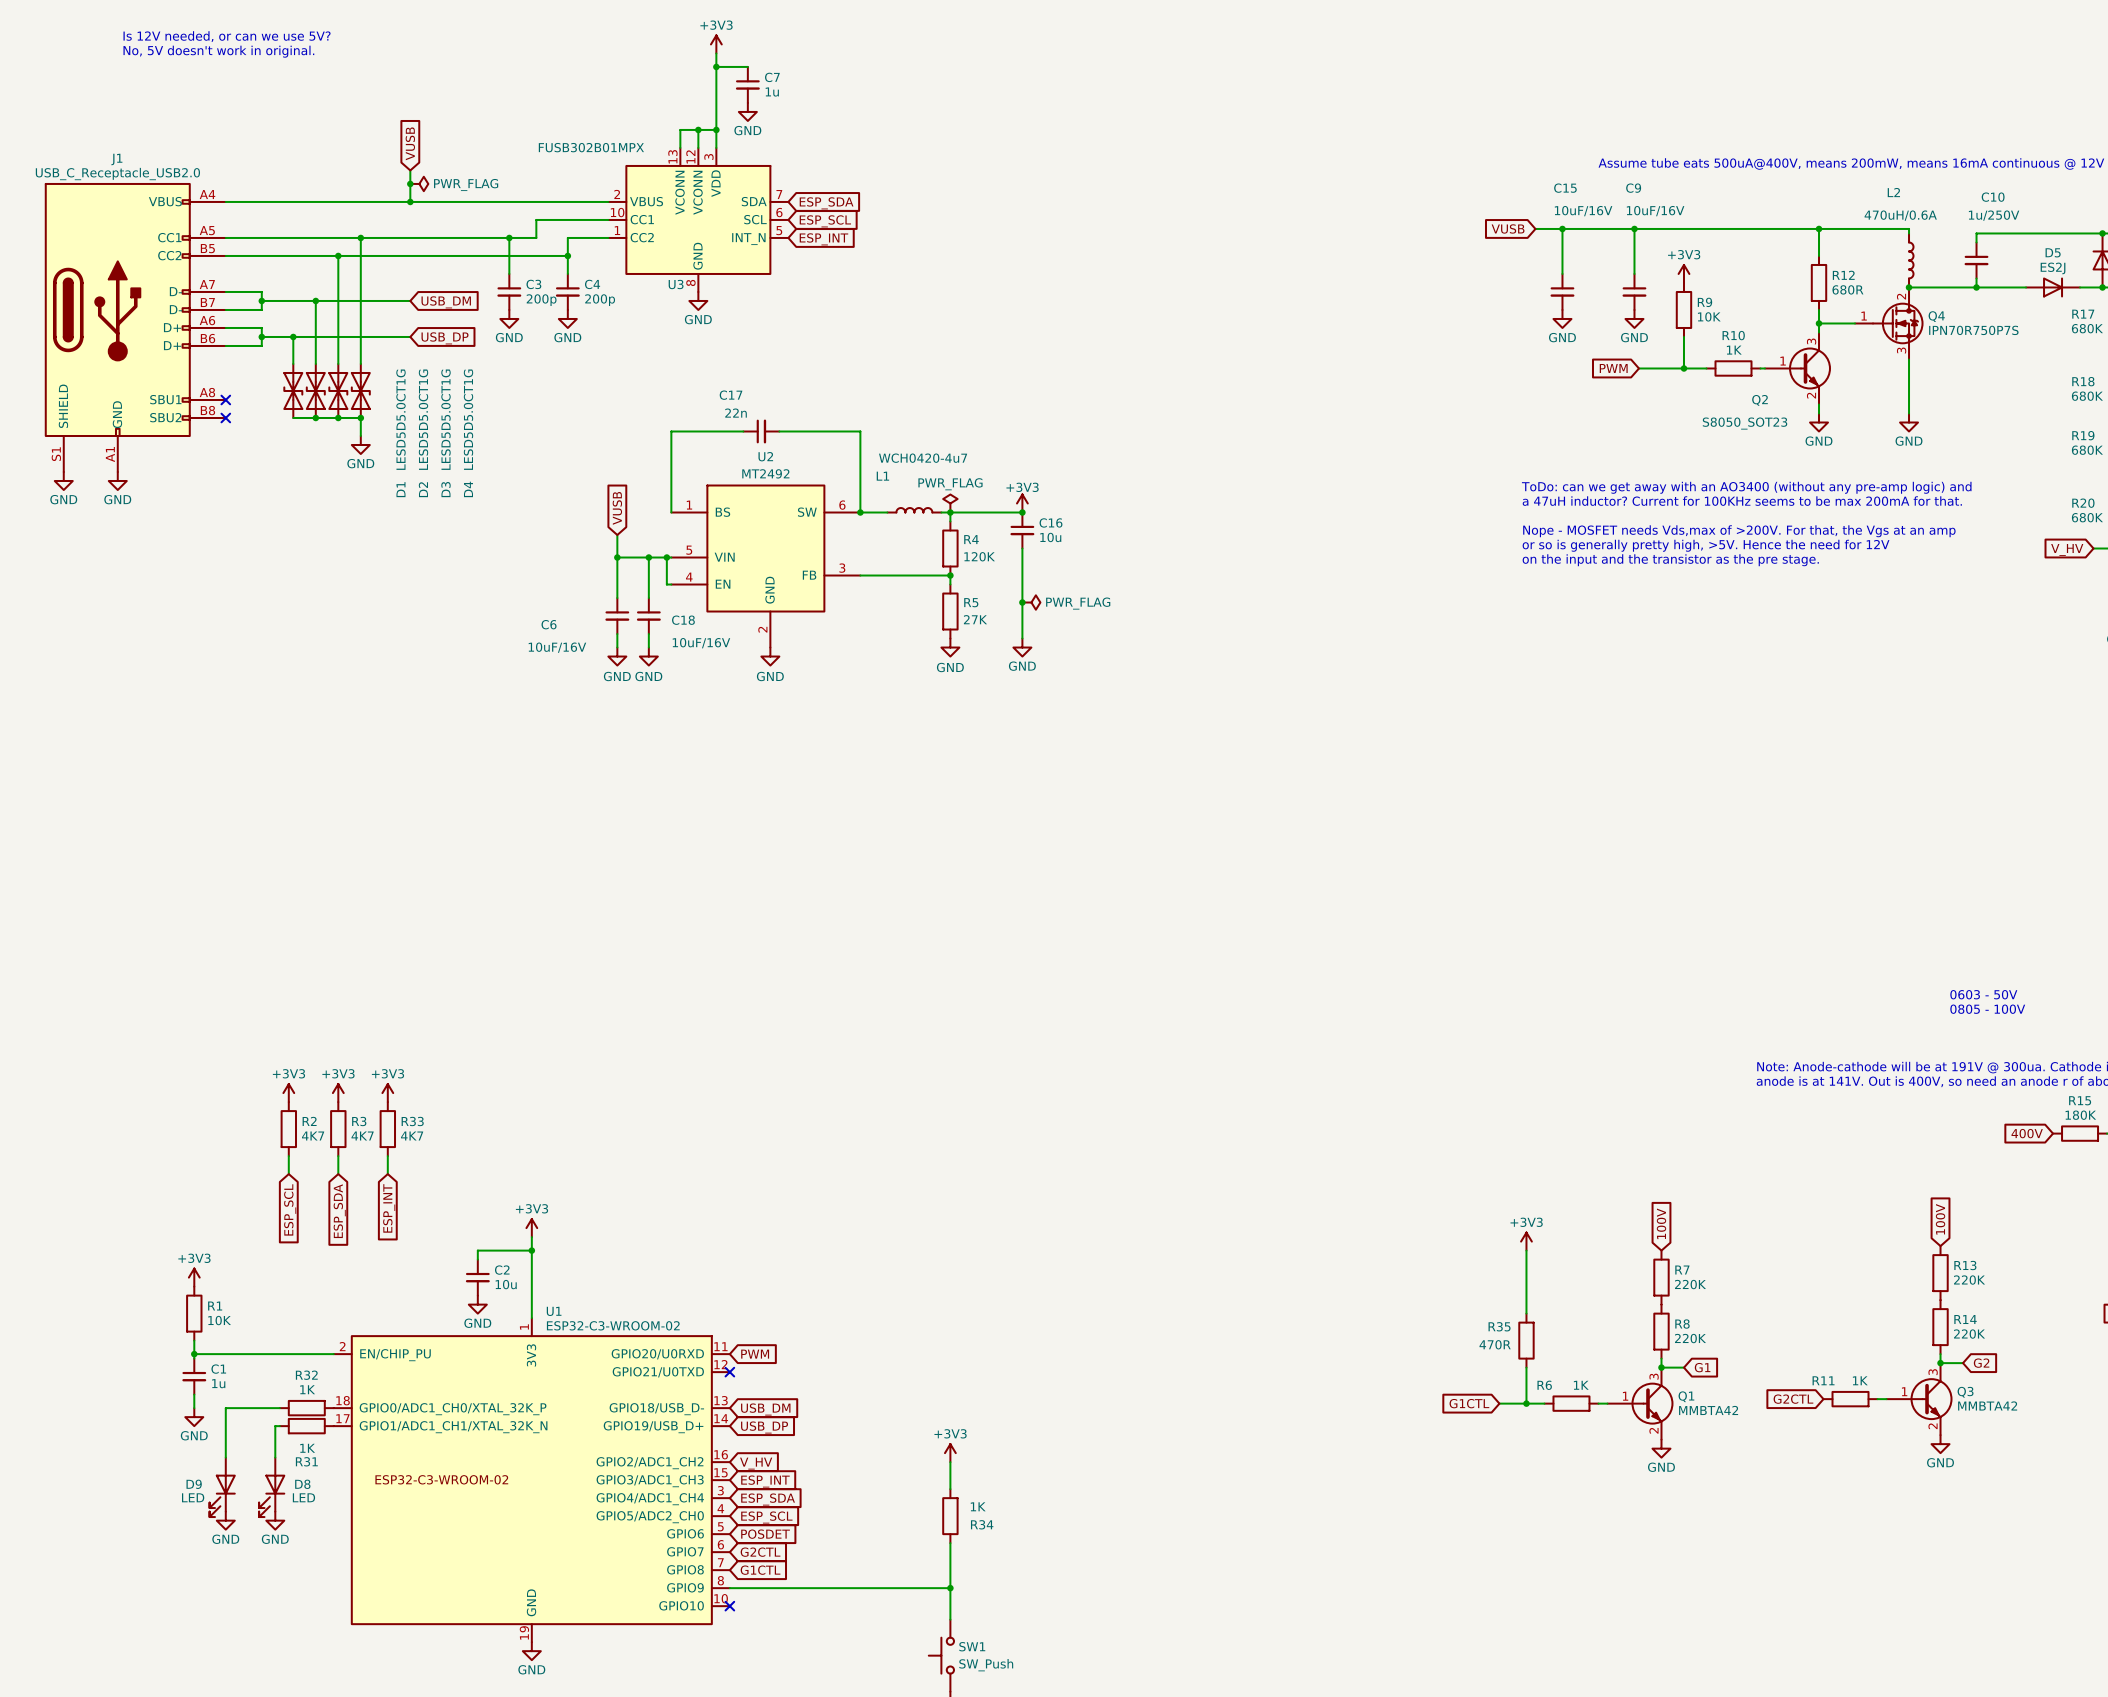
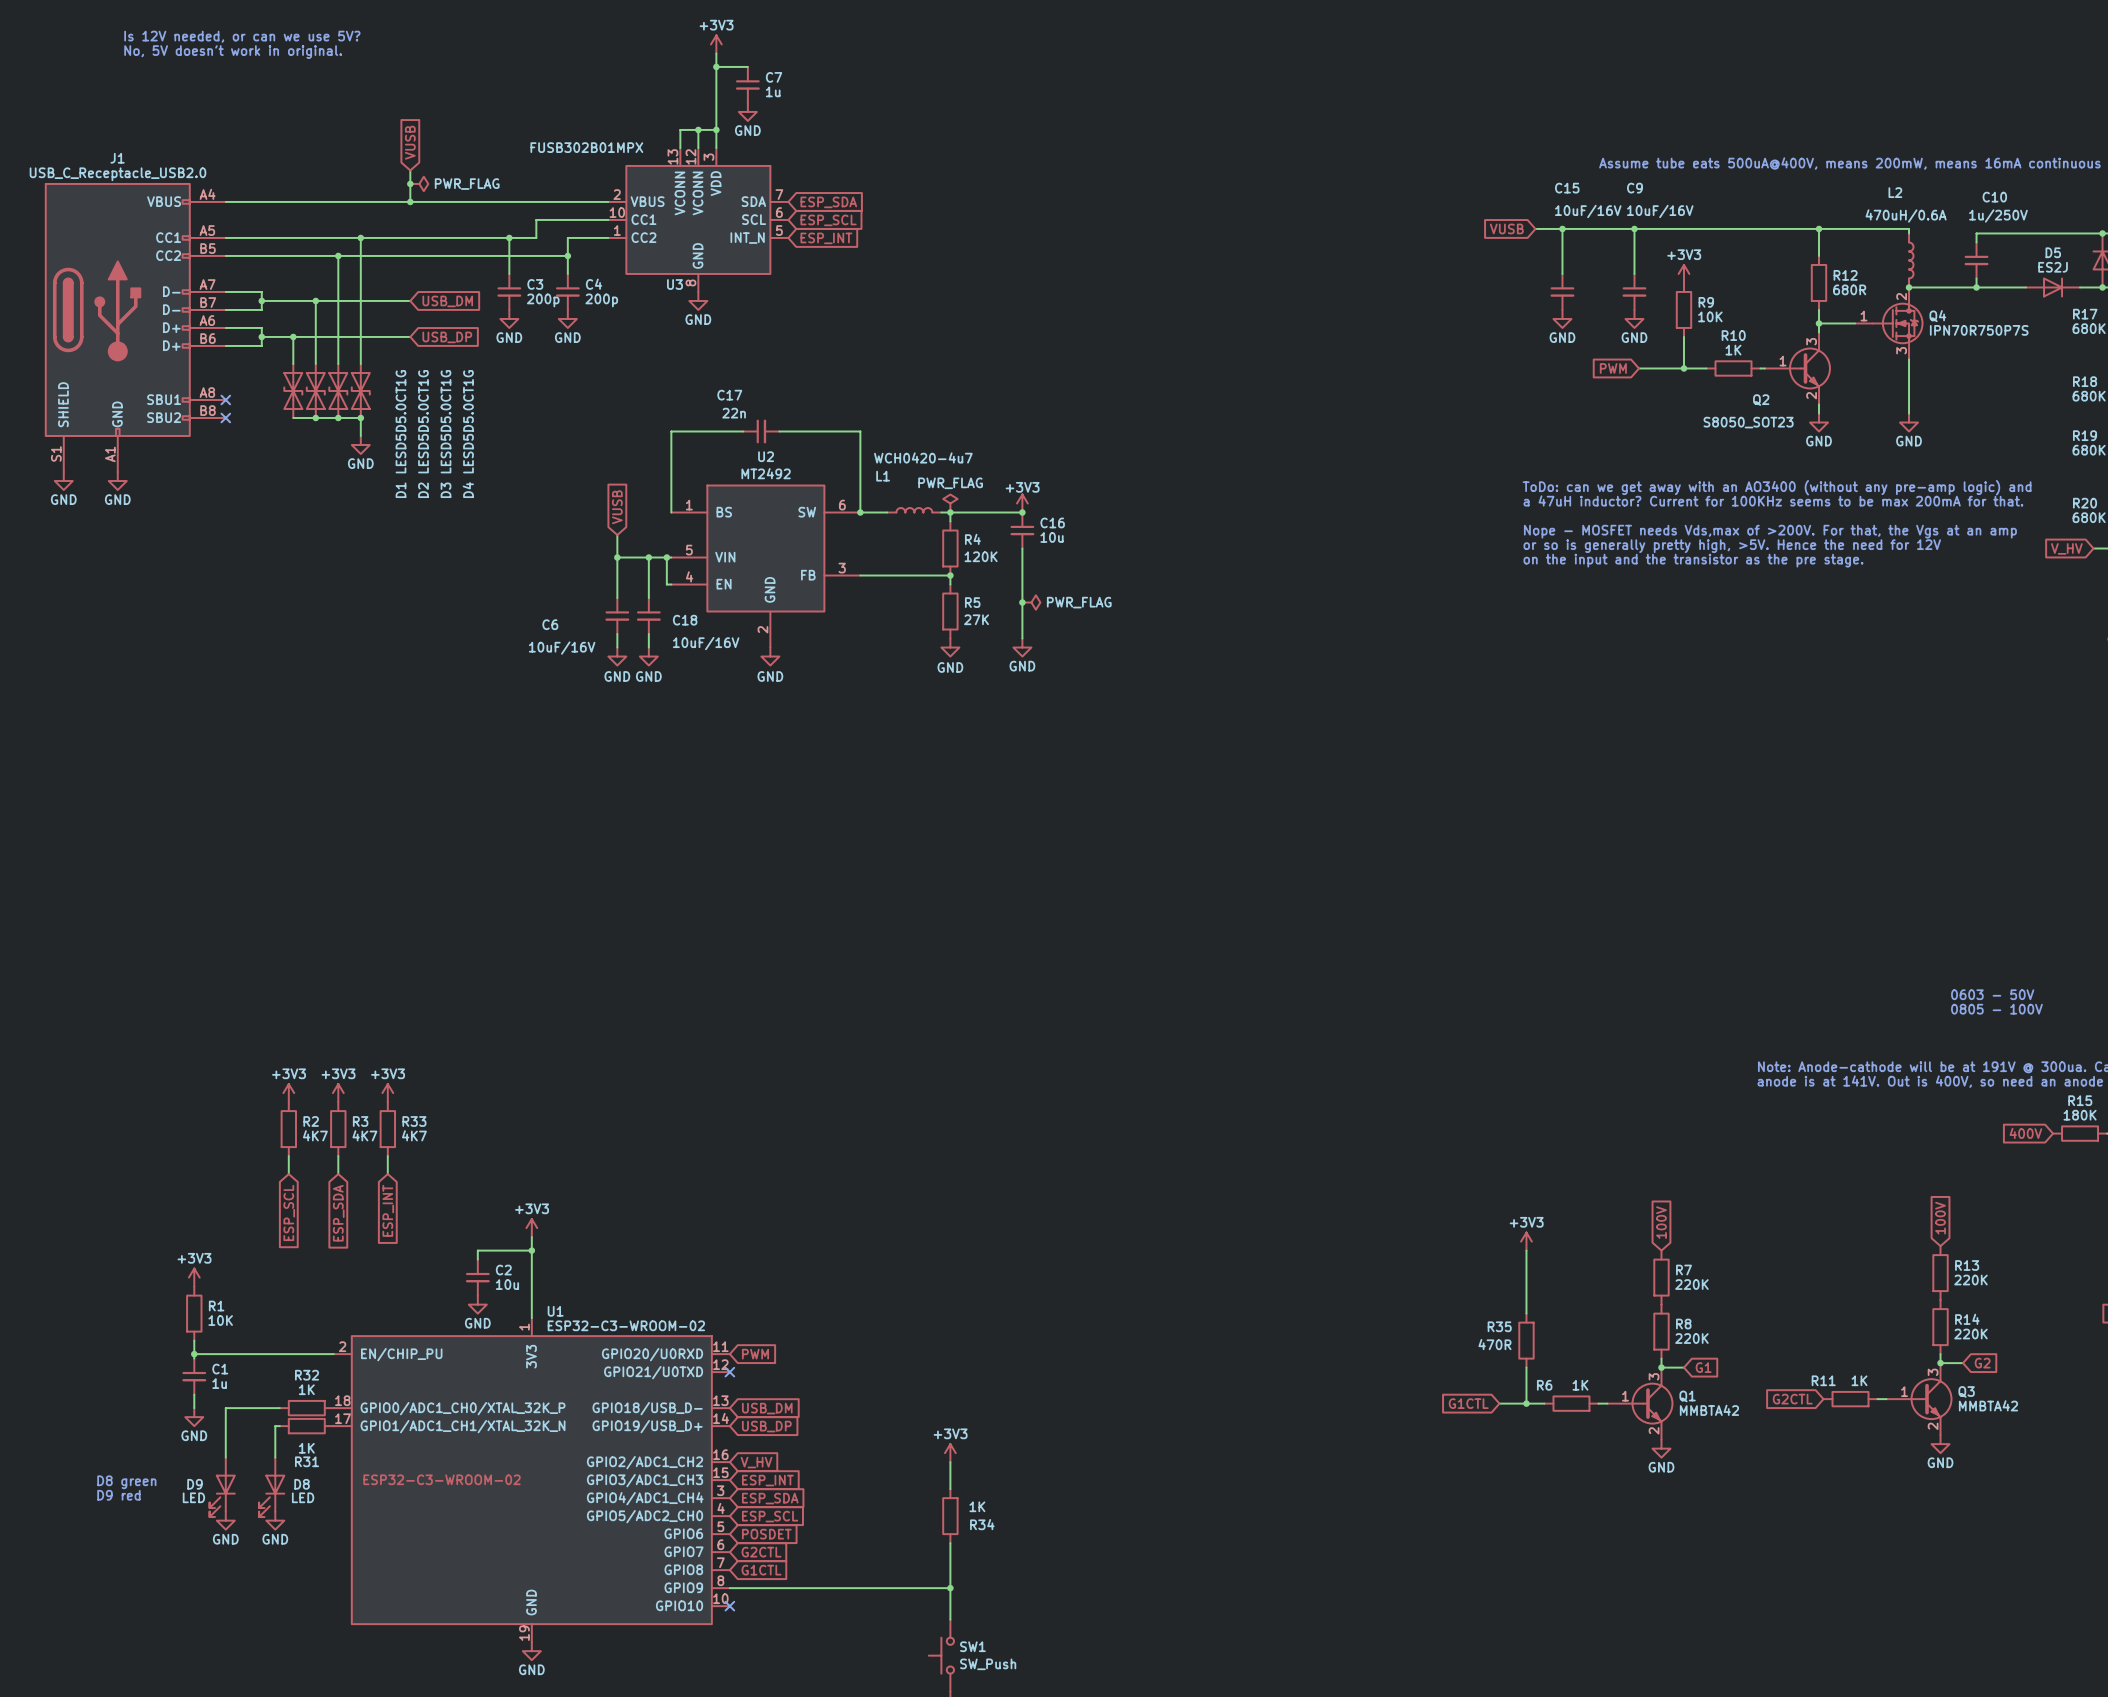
text: none -> D8 green (126, 1482)
text: none -> D9 red (118, 1495)

